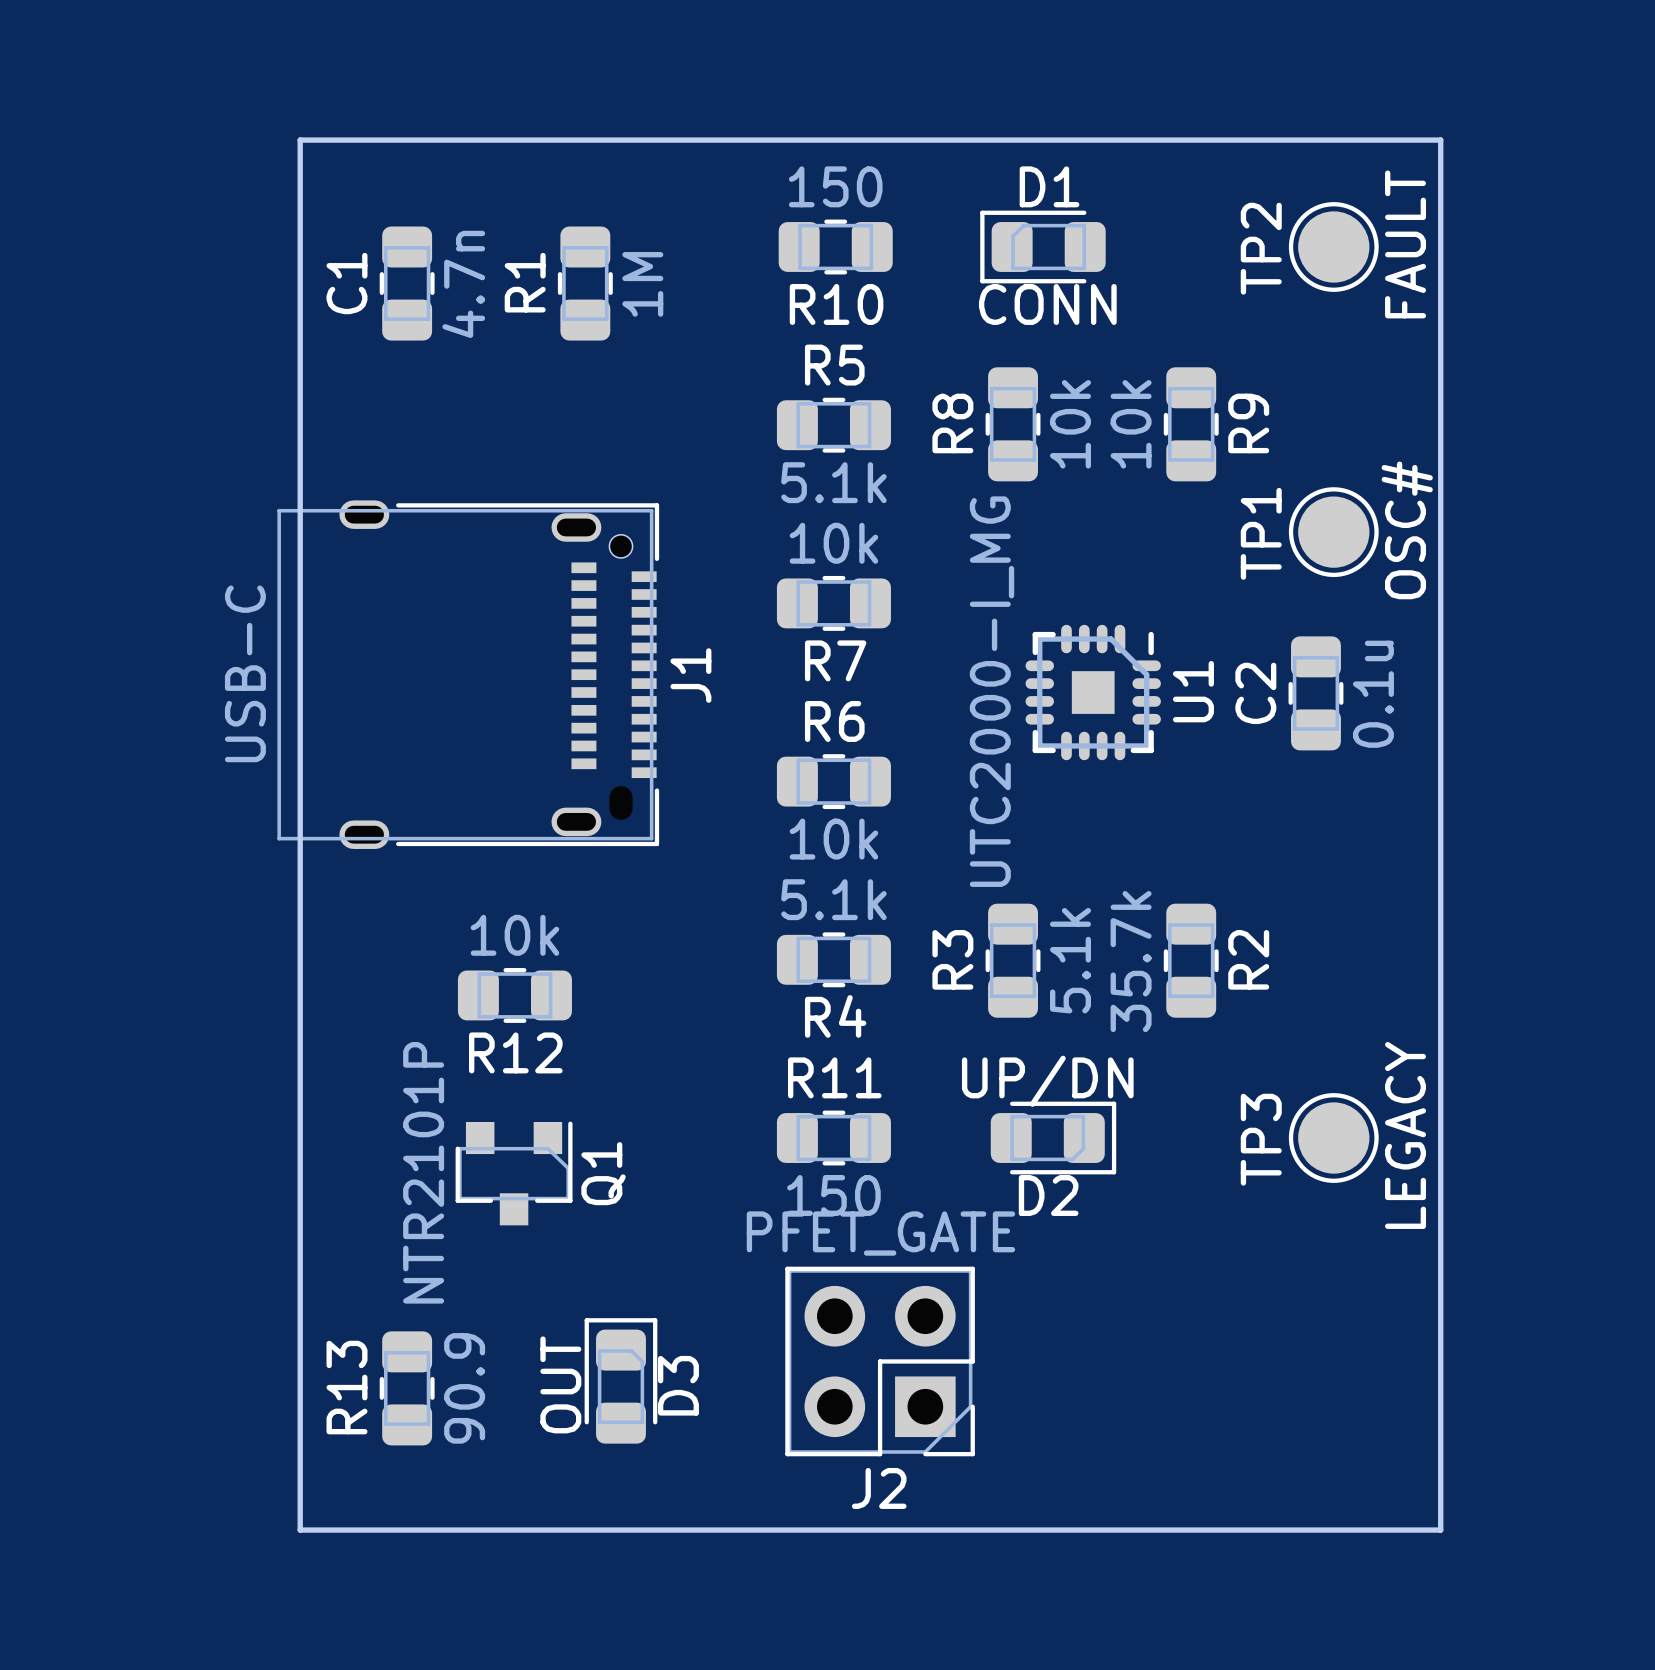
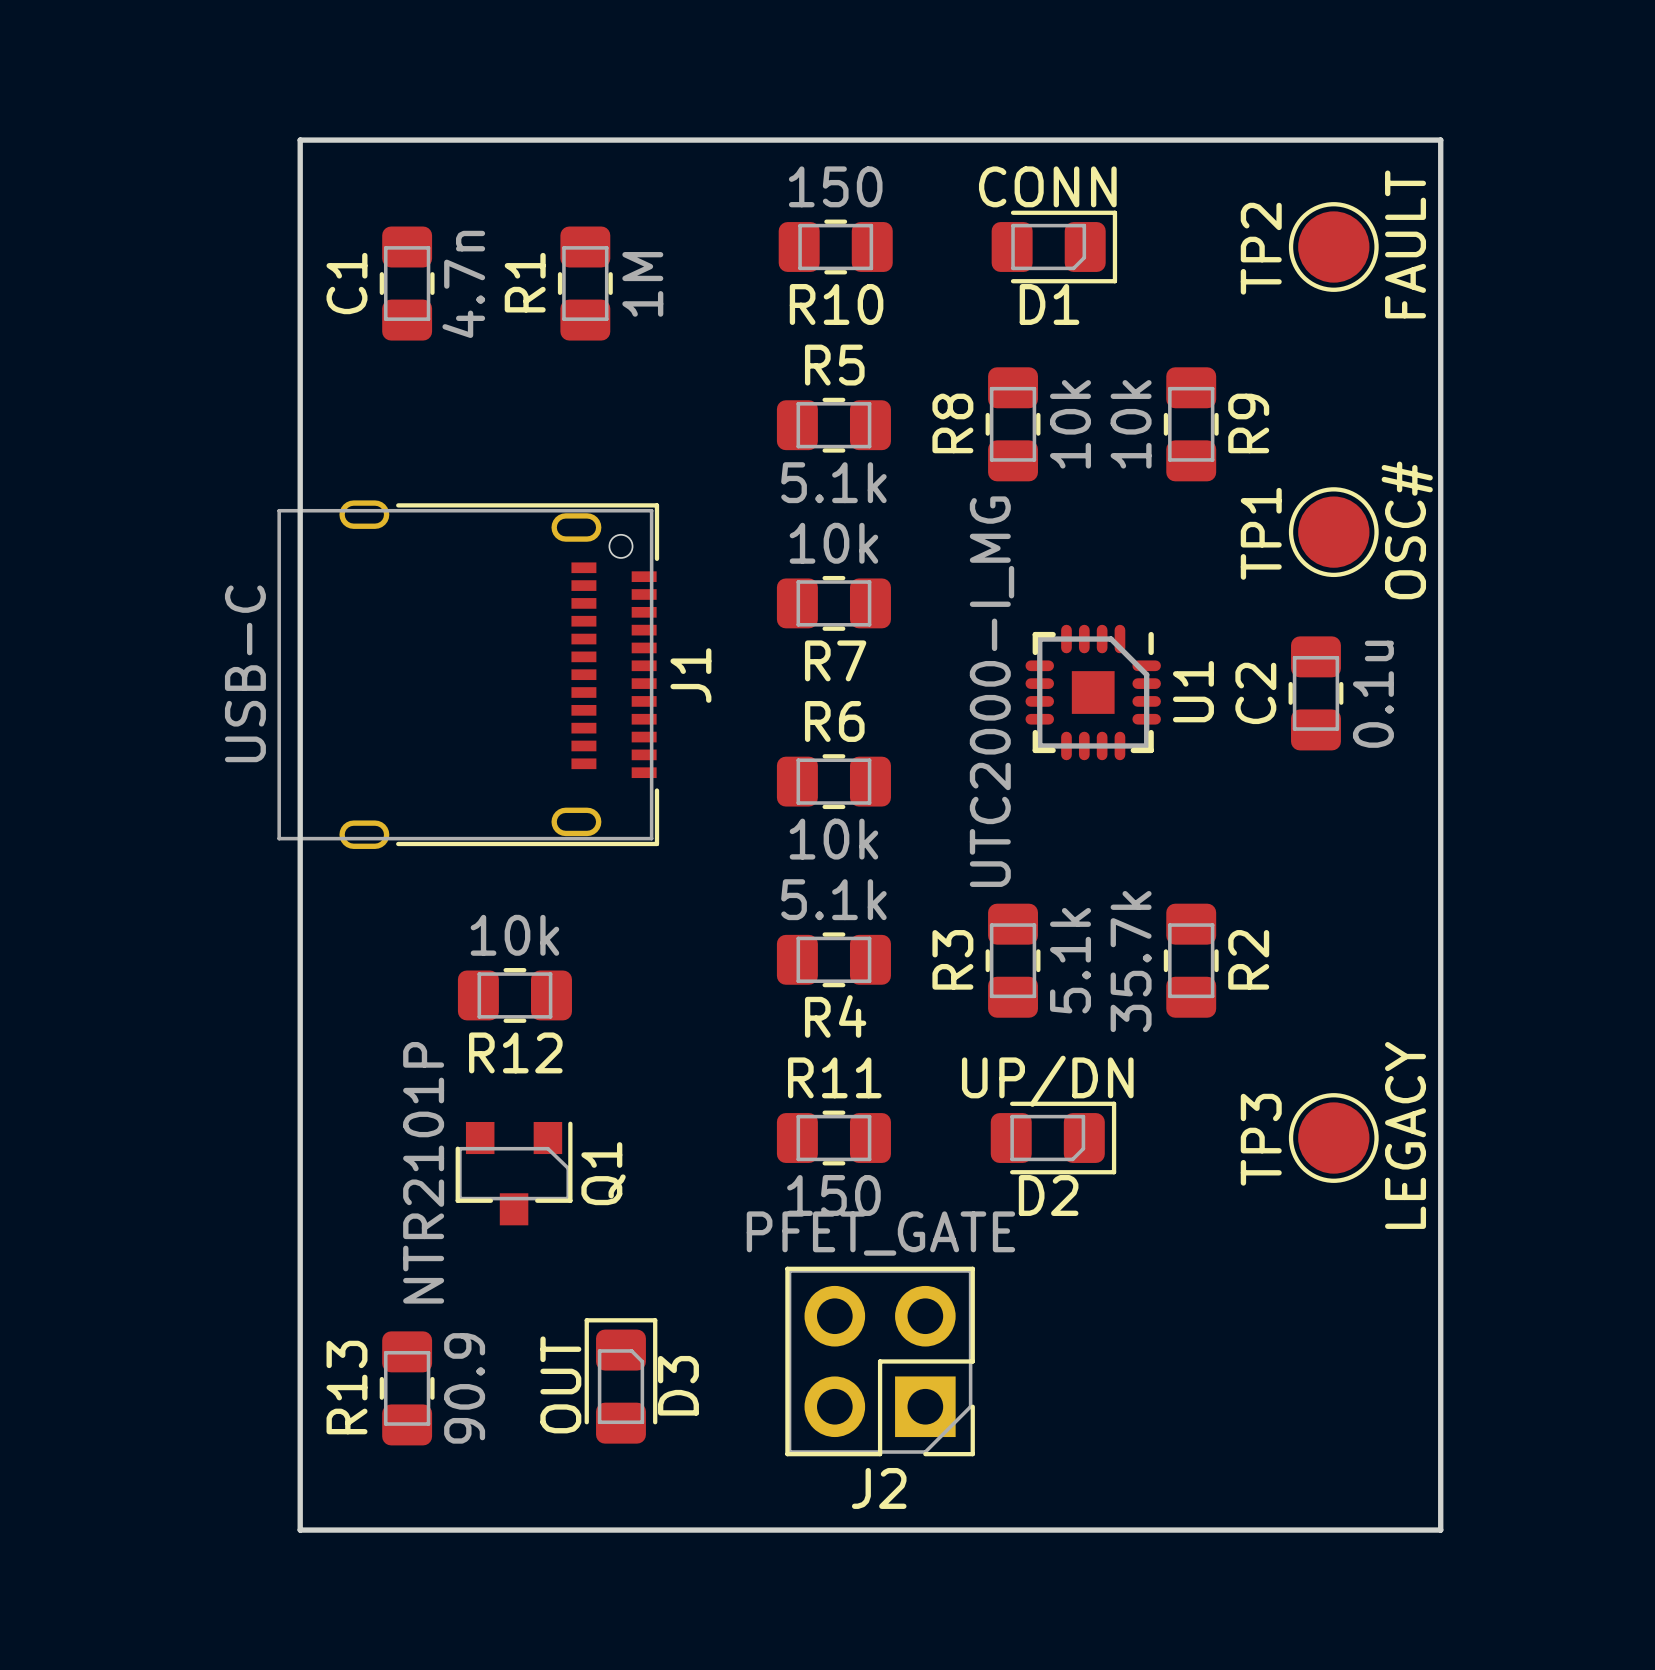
D1 rotation: 0° (1042, 247) -> 180° (1054, 247)

